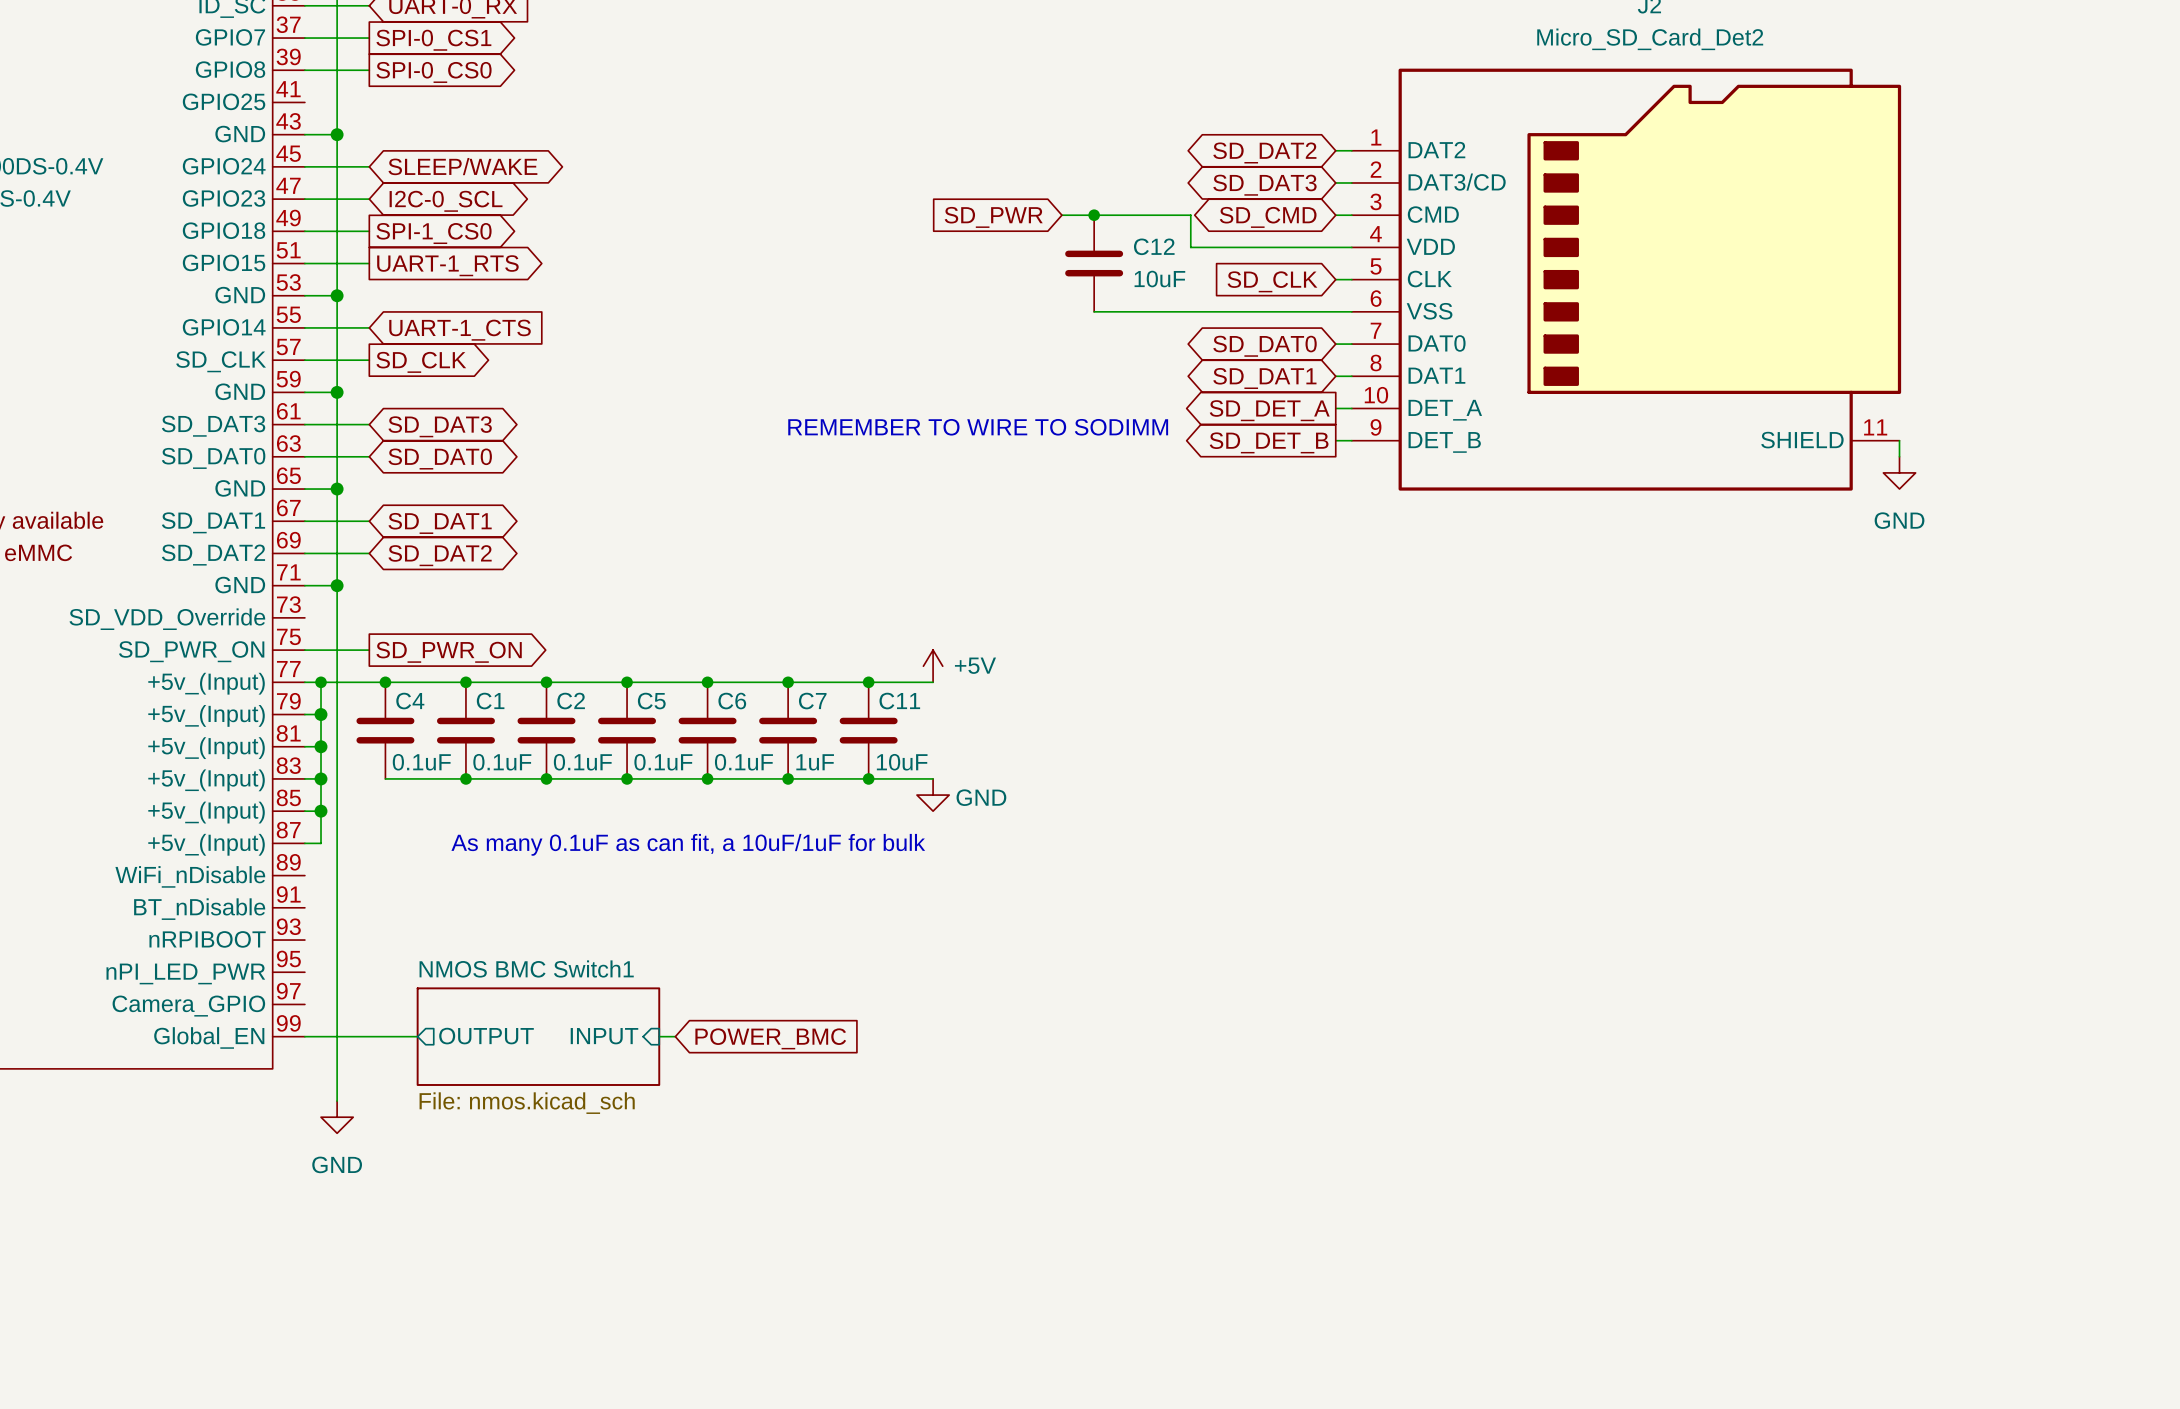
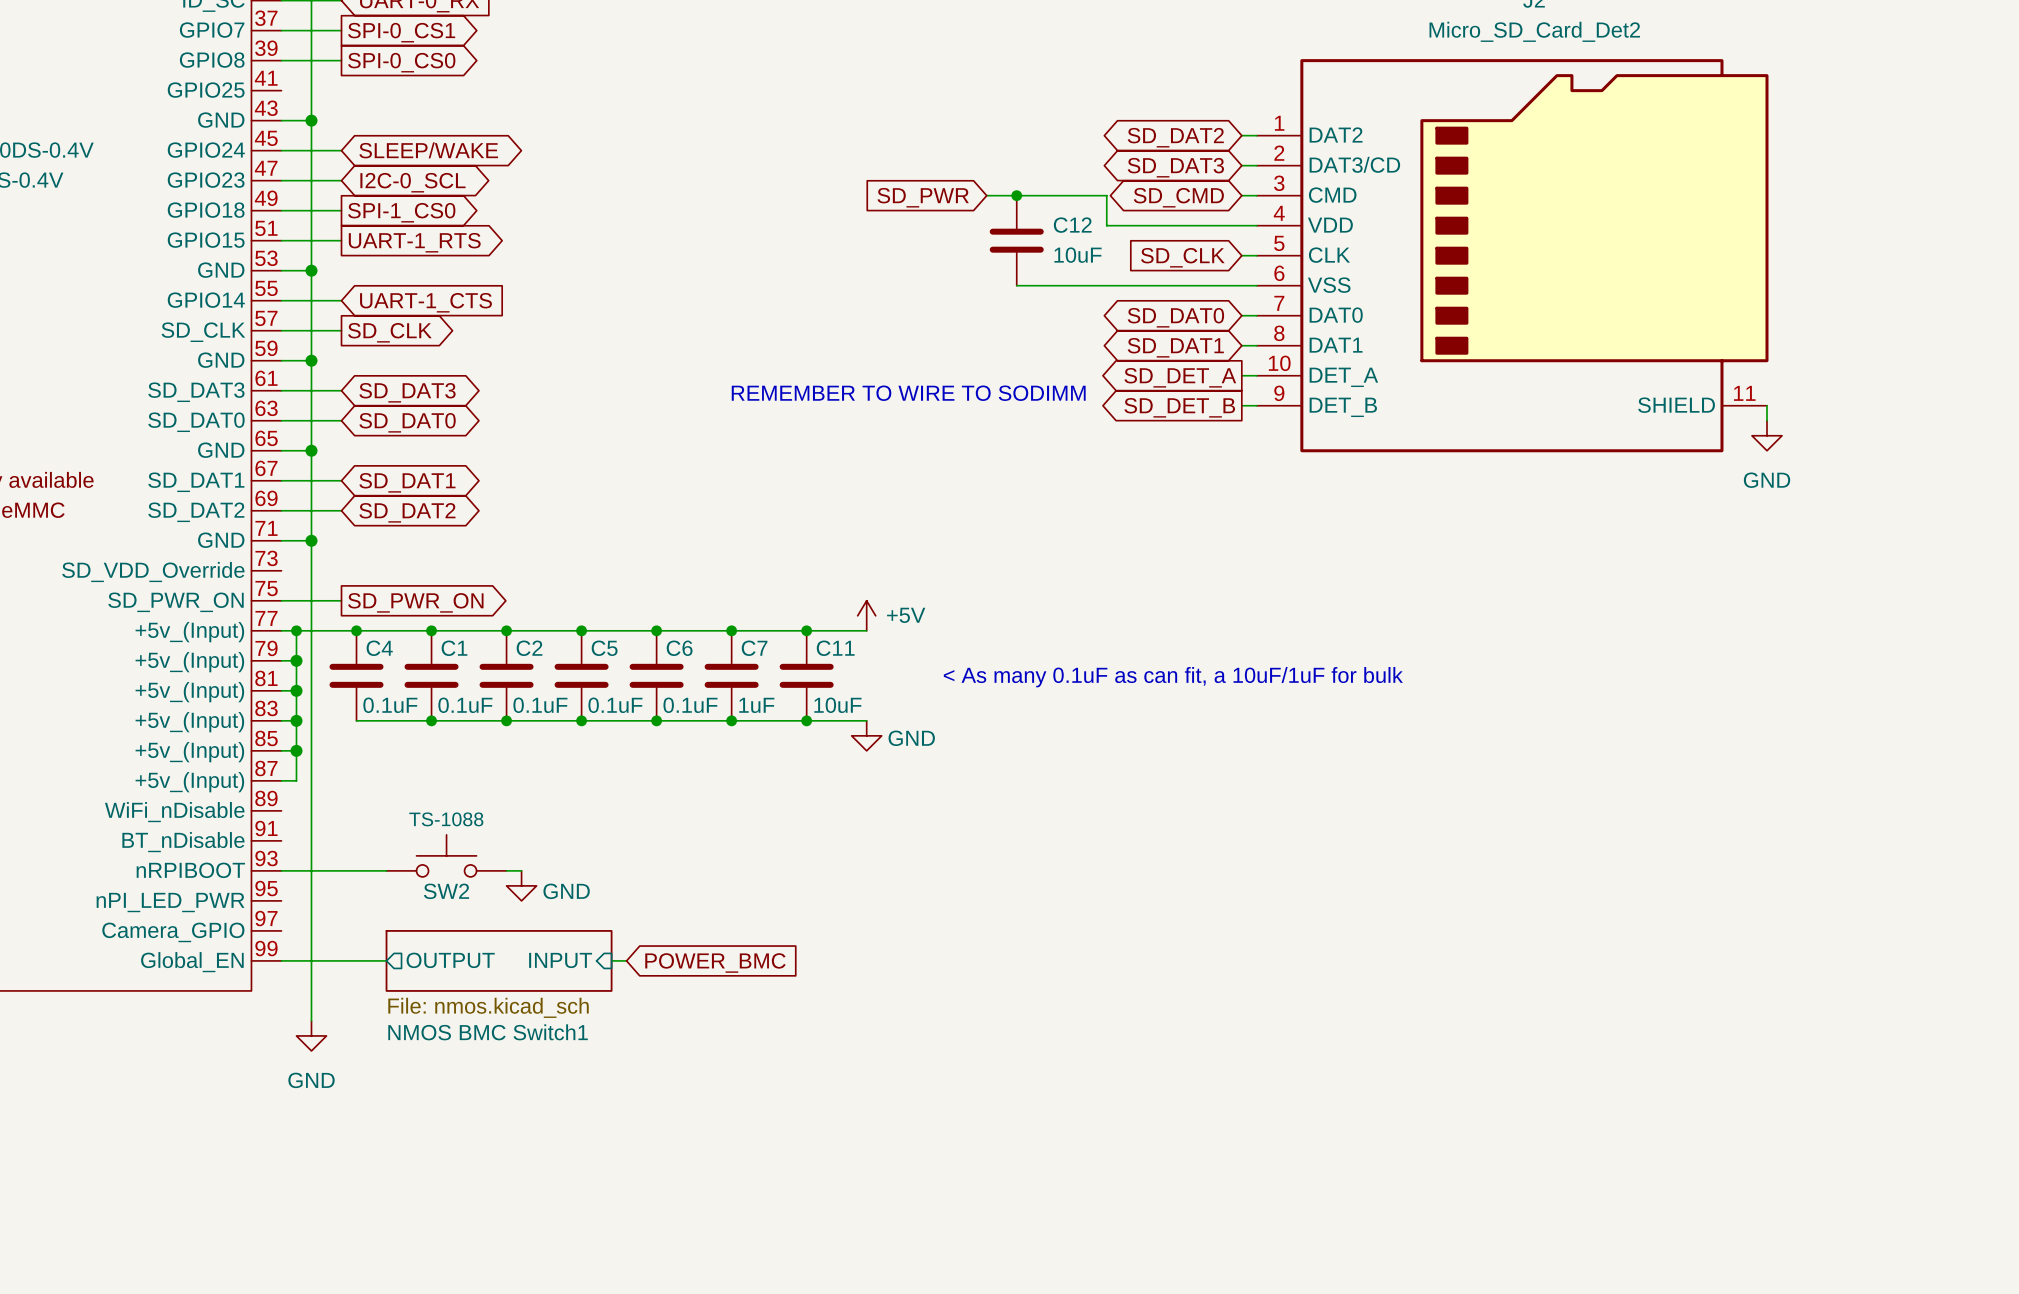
text: none -> < As many 0.1uF as can fit, a 10uF/1uF for bulk (1173, 677)
text: As many 0.1uF as can fit, a 10uF/1uF for bulk (688, 844) -> none
SW2: none -> TS-1088 (446, 855)
wire: none -> (281, 870) (386, 870)
wire: none -> (506, 870) (521, 870)
power symbol: none -> GND (521, 885)
sheet NMOS BMC Switch1 name position: NMOS BMC Switch1 (526, 968) -> NMOS BMC Switch1 (488, 1032)
sheet NMOS BMC Switch1 shape: [416, 987, 661, 1086] -> [385, 930, 613, 992]

